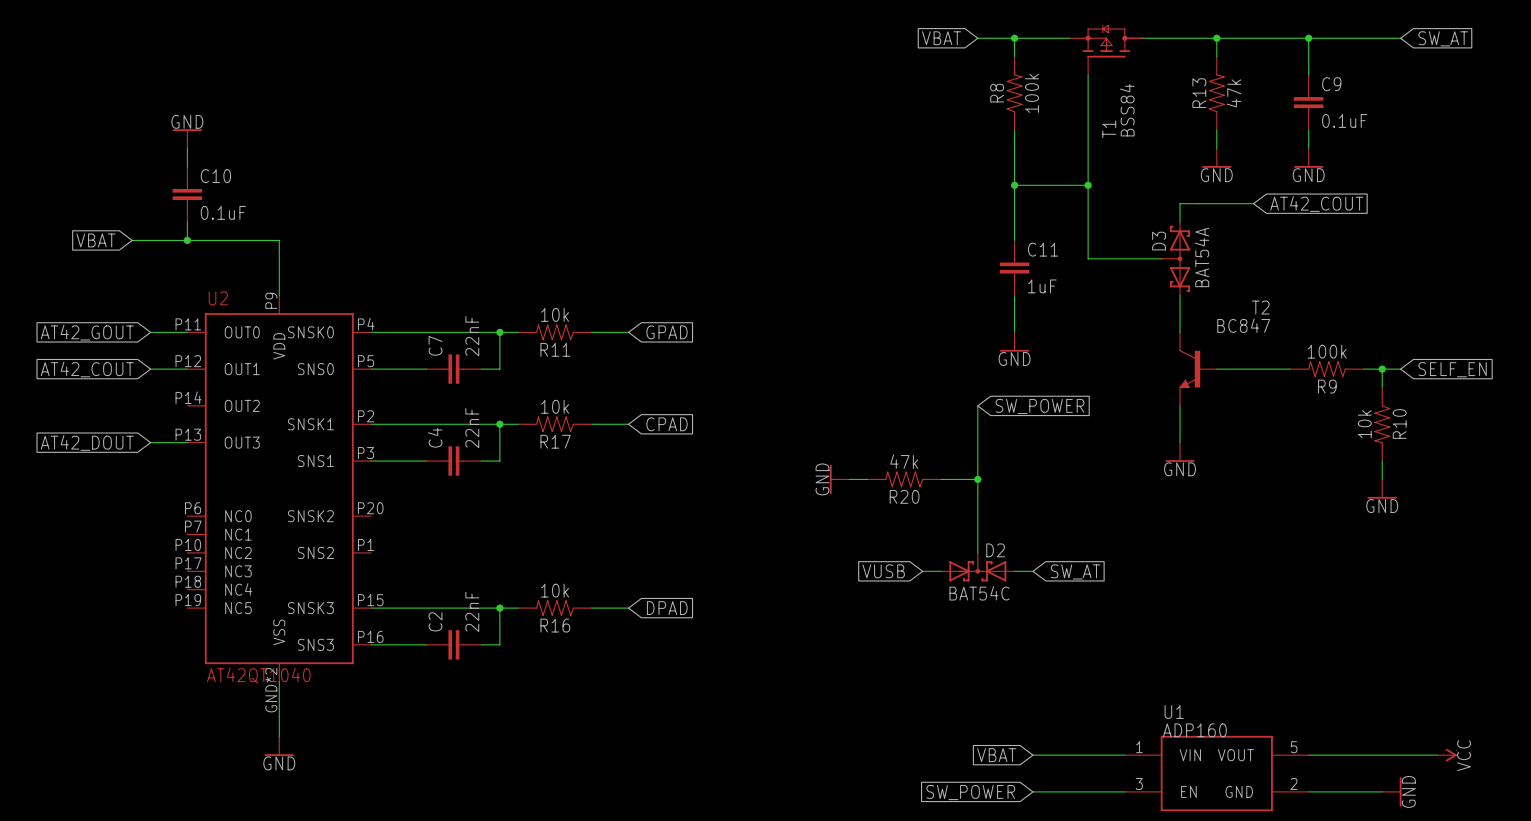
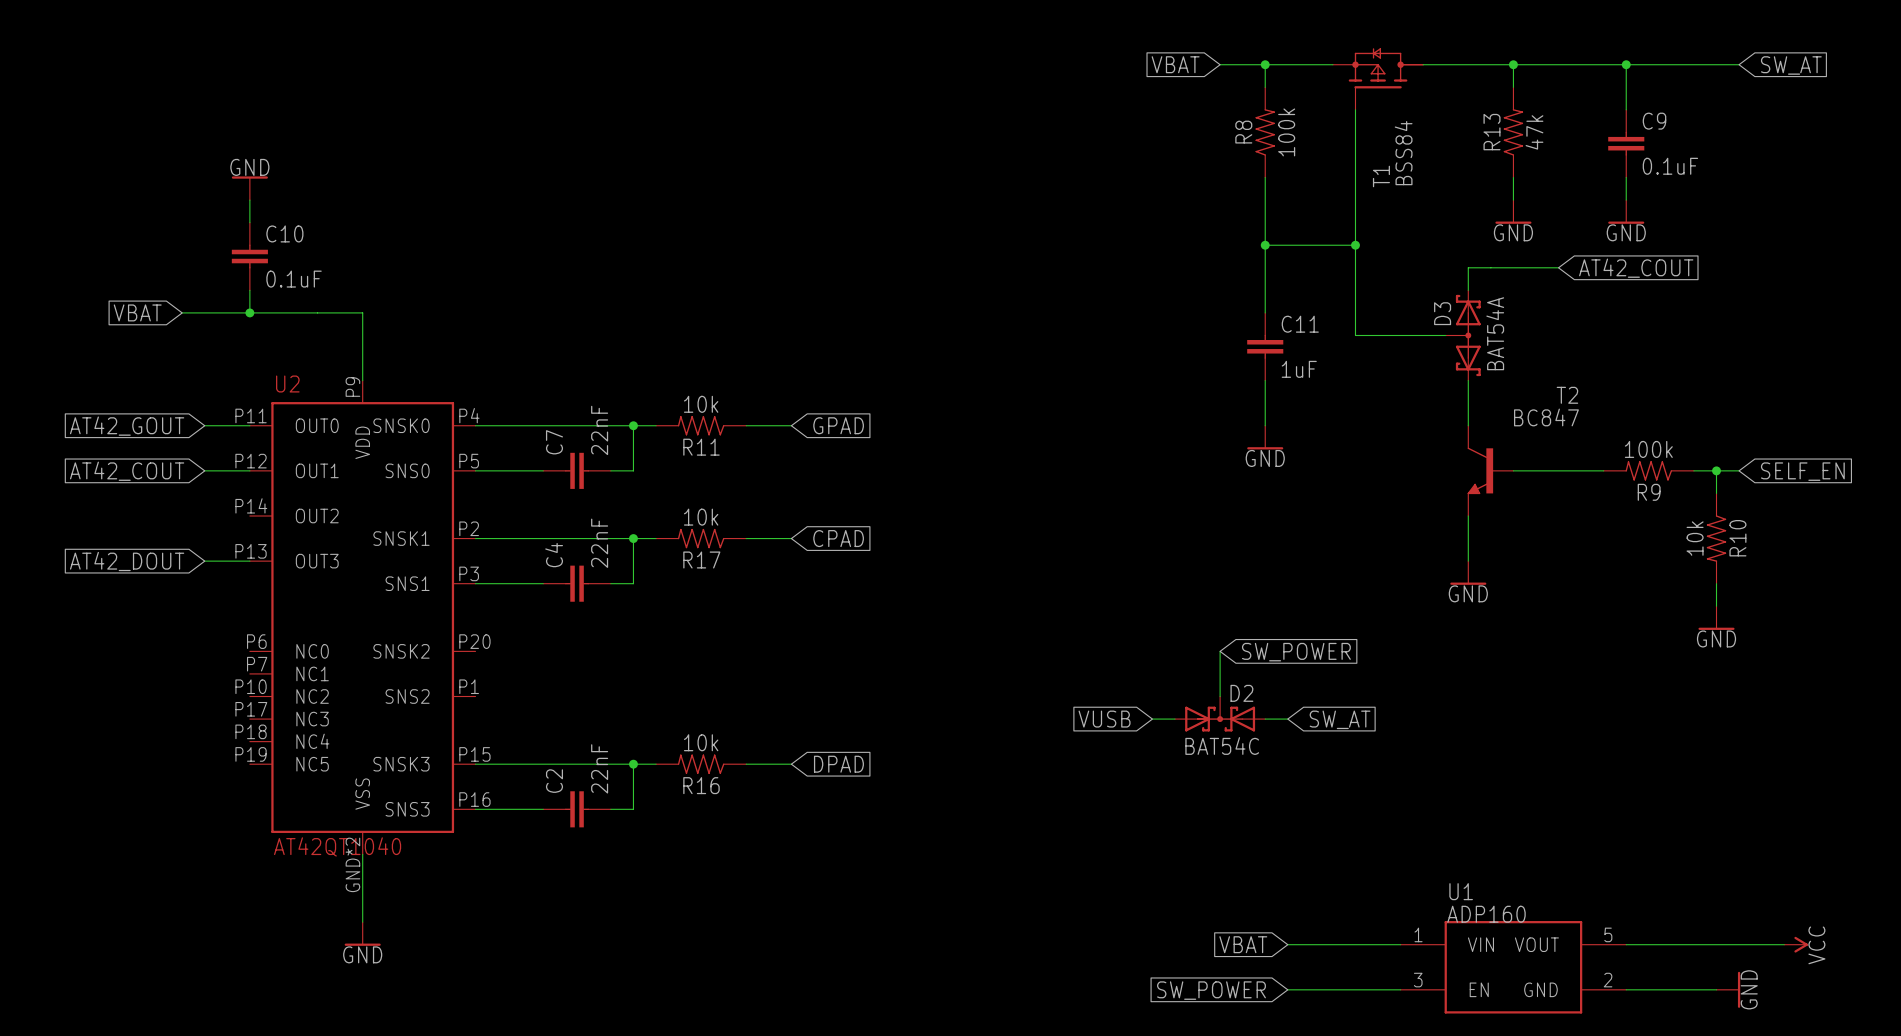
wire: (977, 405) (977, 516) -> none
global label position: SW_POWER (1039, 406) -> SW_POWER (1296, 652)
power symbol: GND (839, 479) -> none
wire: (849, 479) (867, 479) -> none
R20: 47k (904, 479) -> none
wire: (941, 479) (977, 479) -> none
junction: (977, 479) -> none

